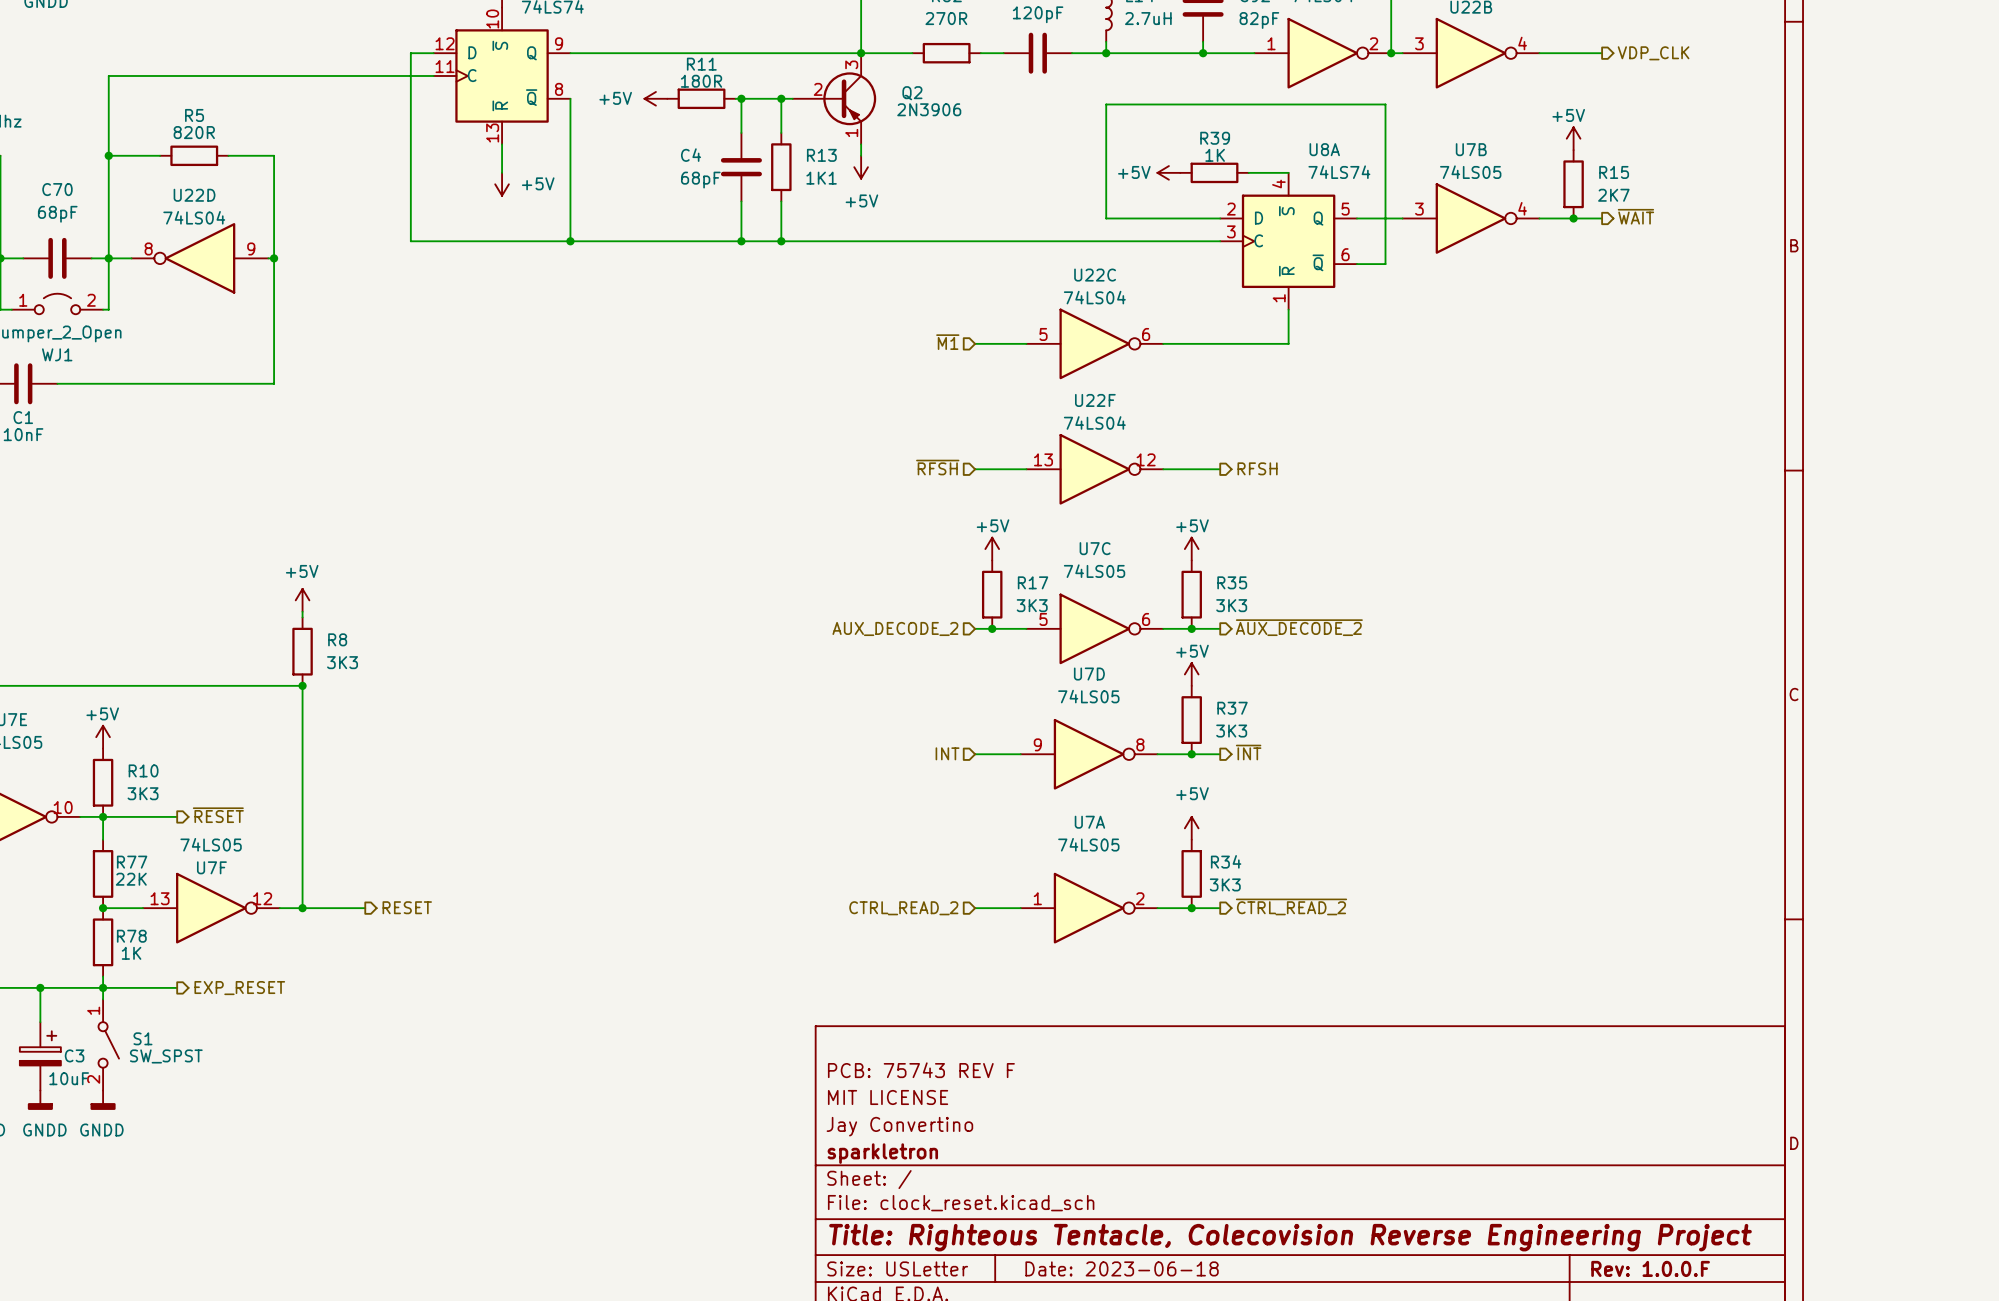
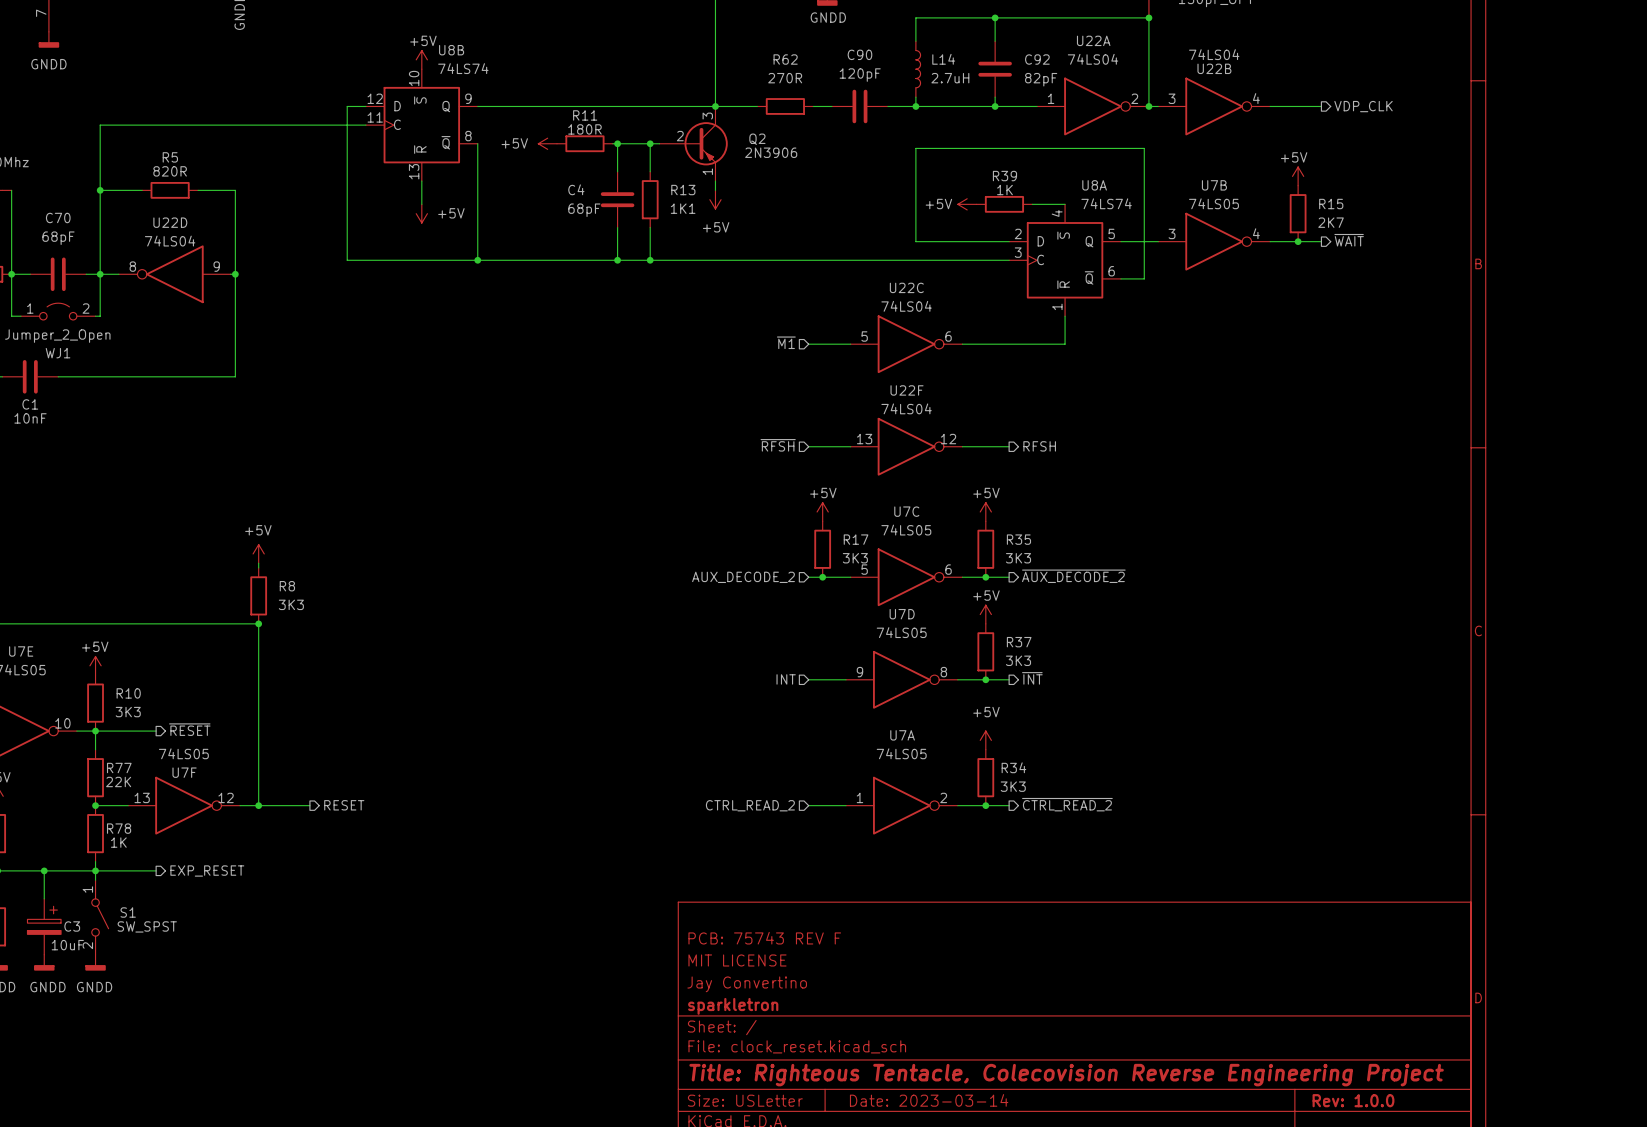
title block: Date: 2023-06-18 (1122, 1268) -> Date: 2023-03-14 (929, 1100)
title block: Rev: 1.0.0.F (1650, 1268) -> Rev: 1.0.0 (1353, 1100)

